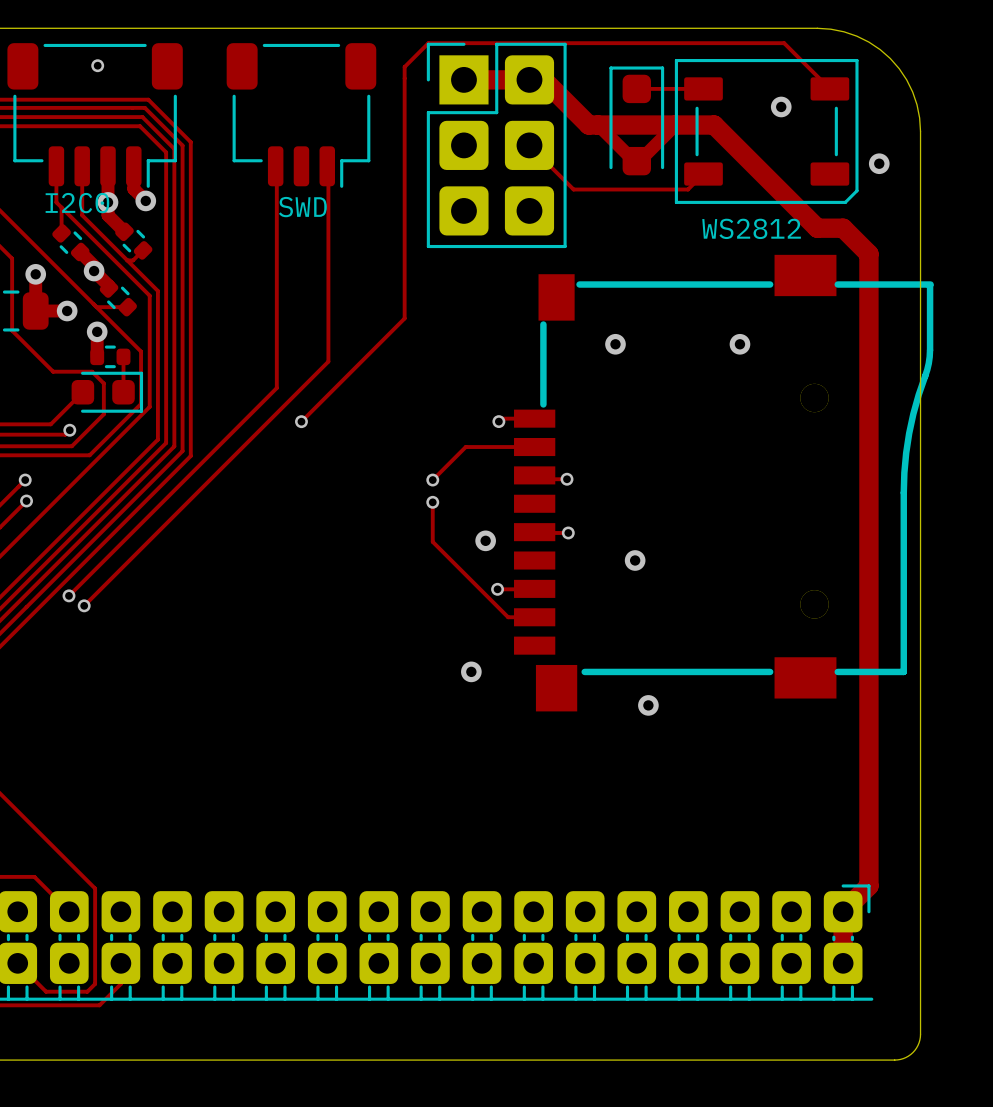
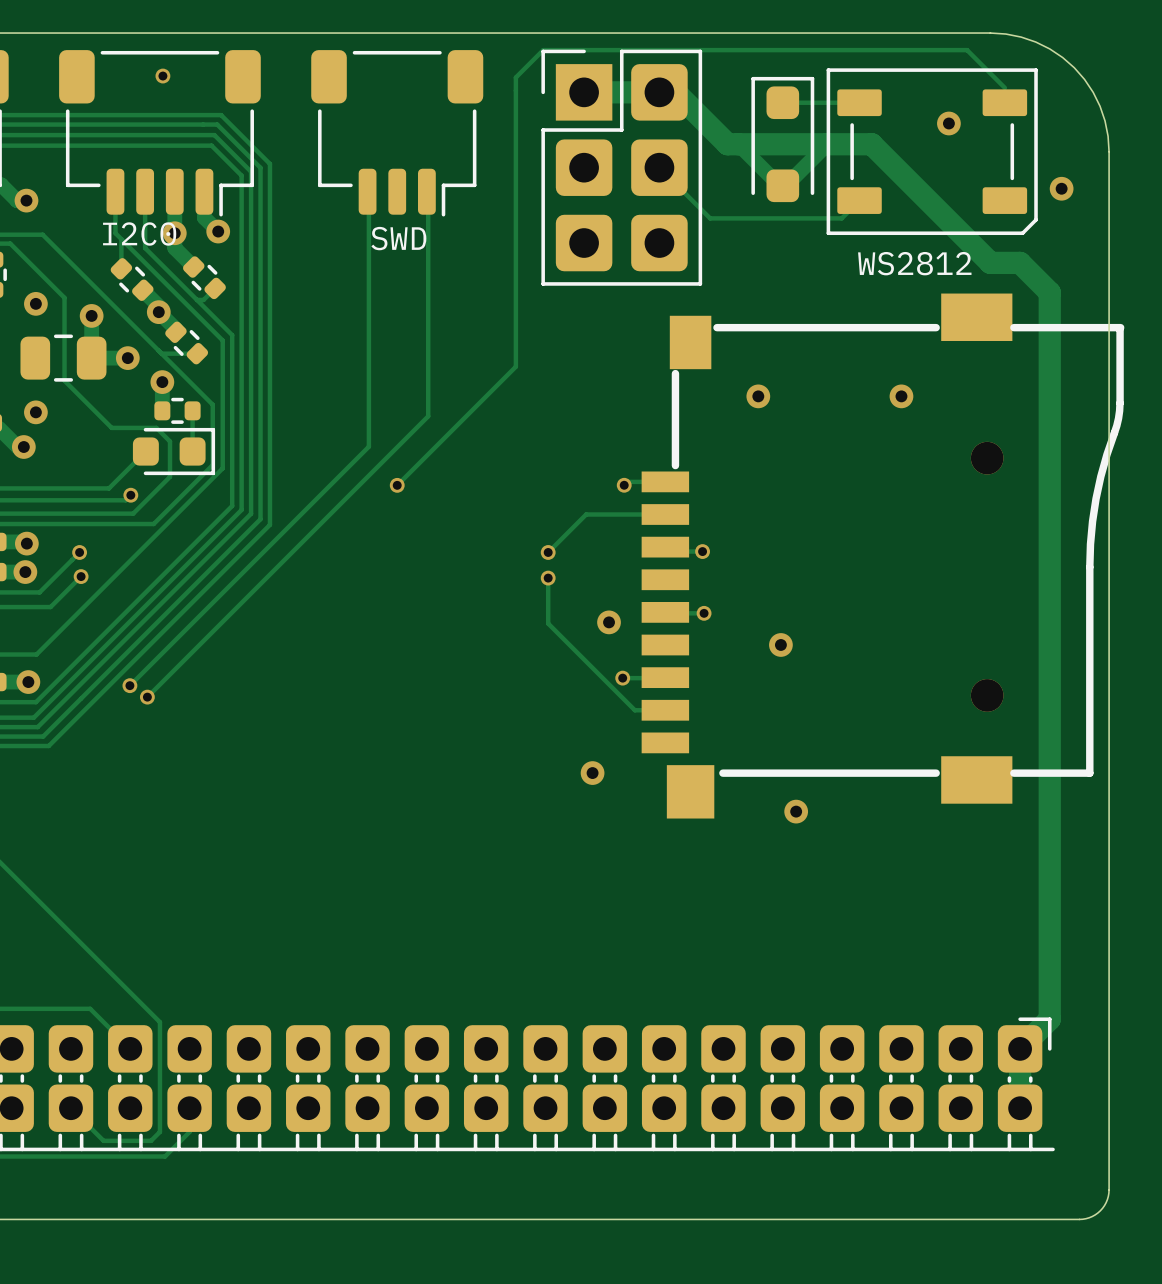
track: (784, 43) (829, 88) -> (952, 50) (967, 50) (1004, 87)

